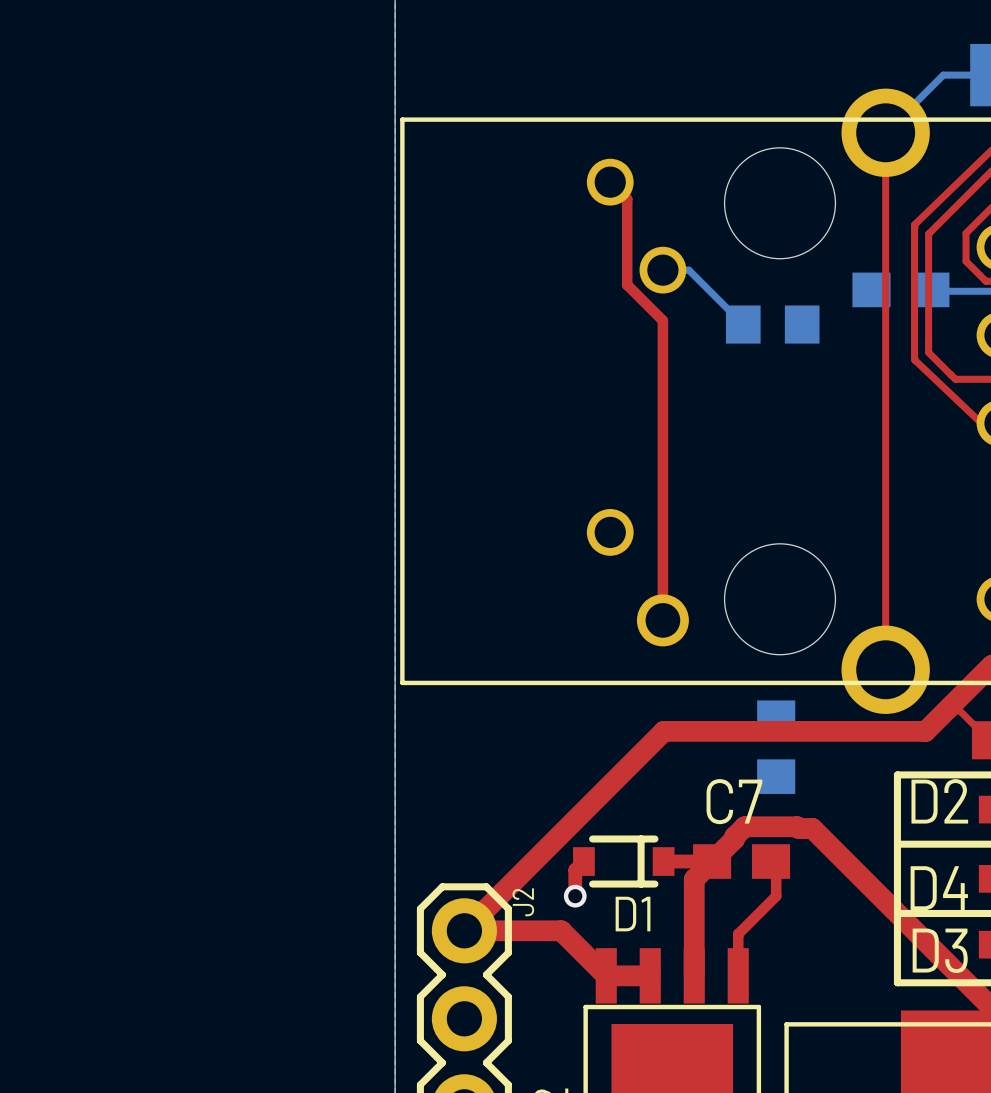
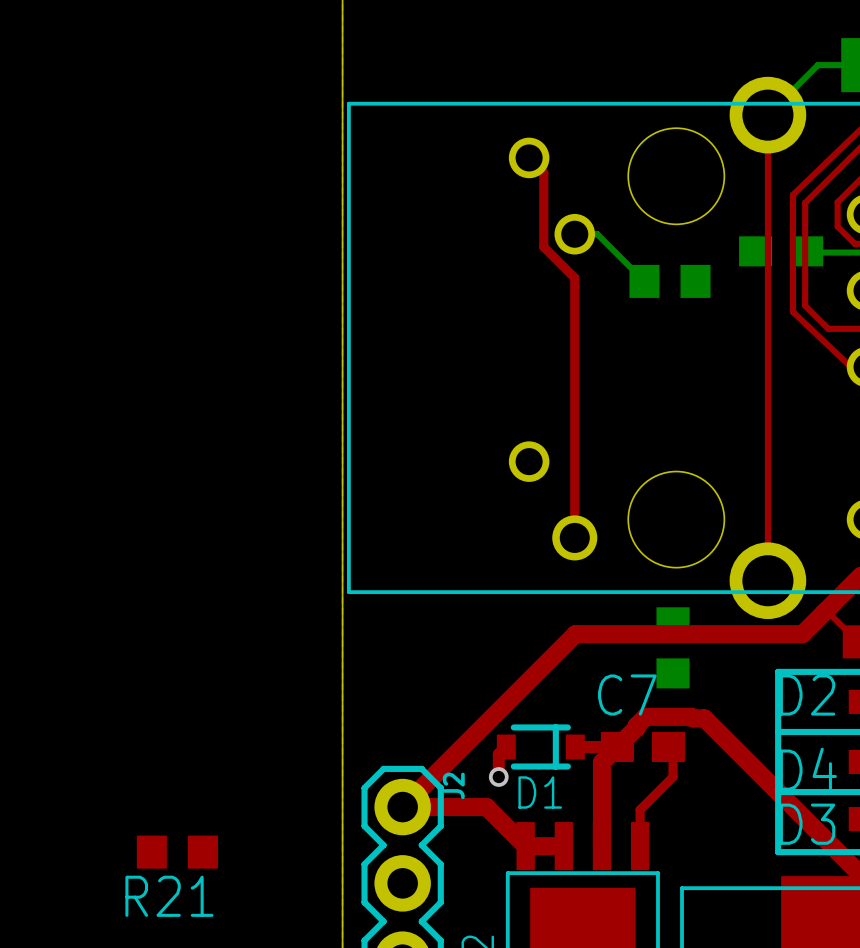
R21: none -> (177, 852)

